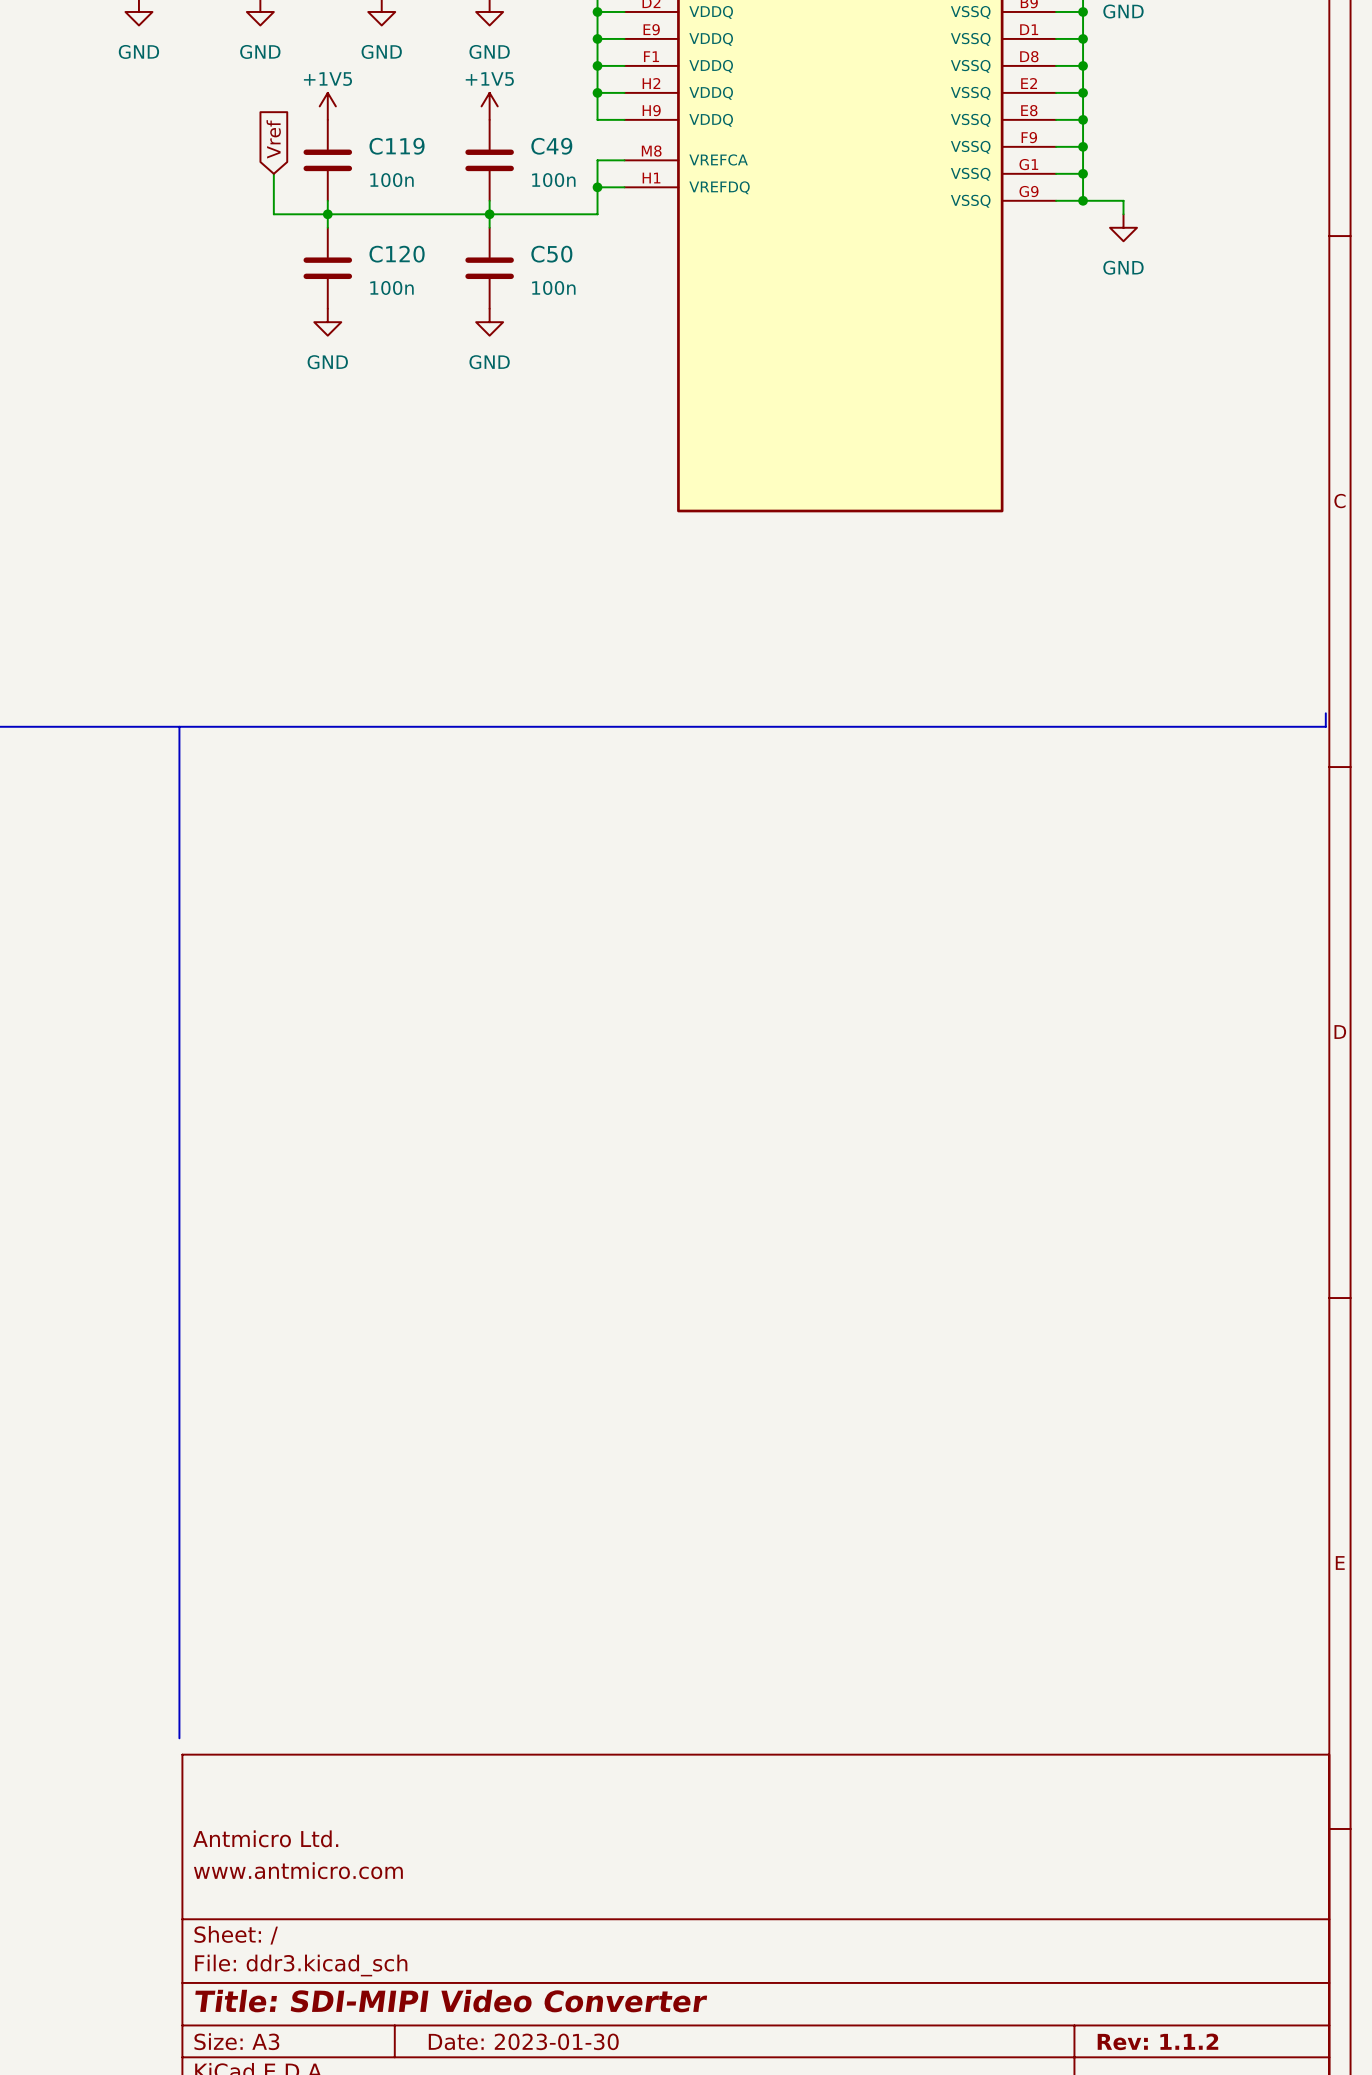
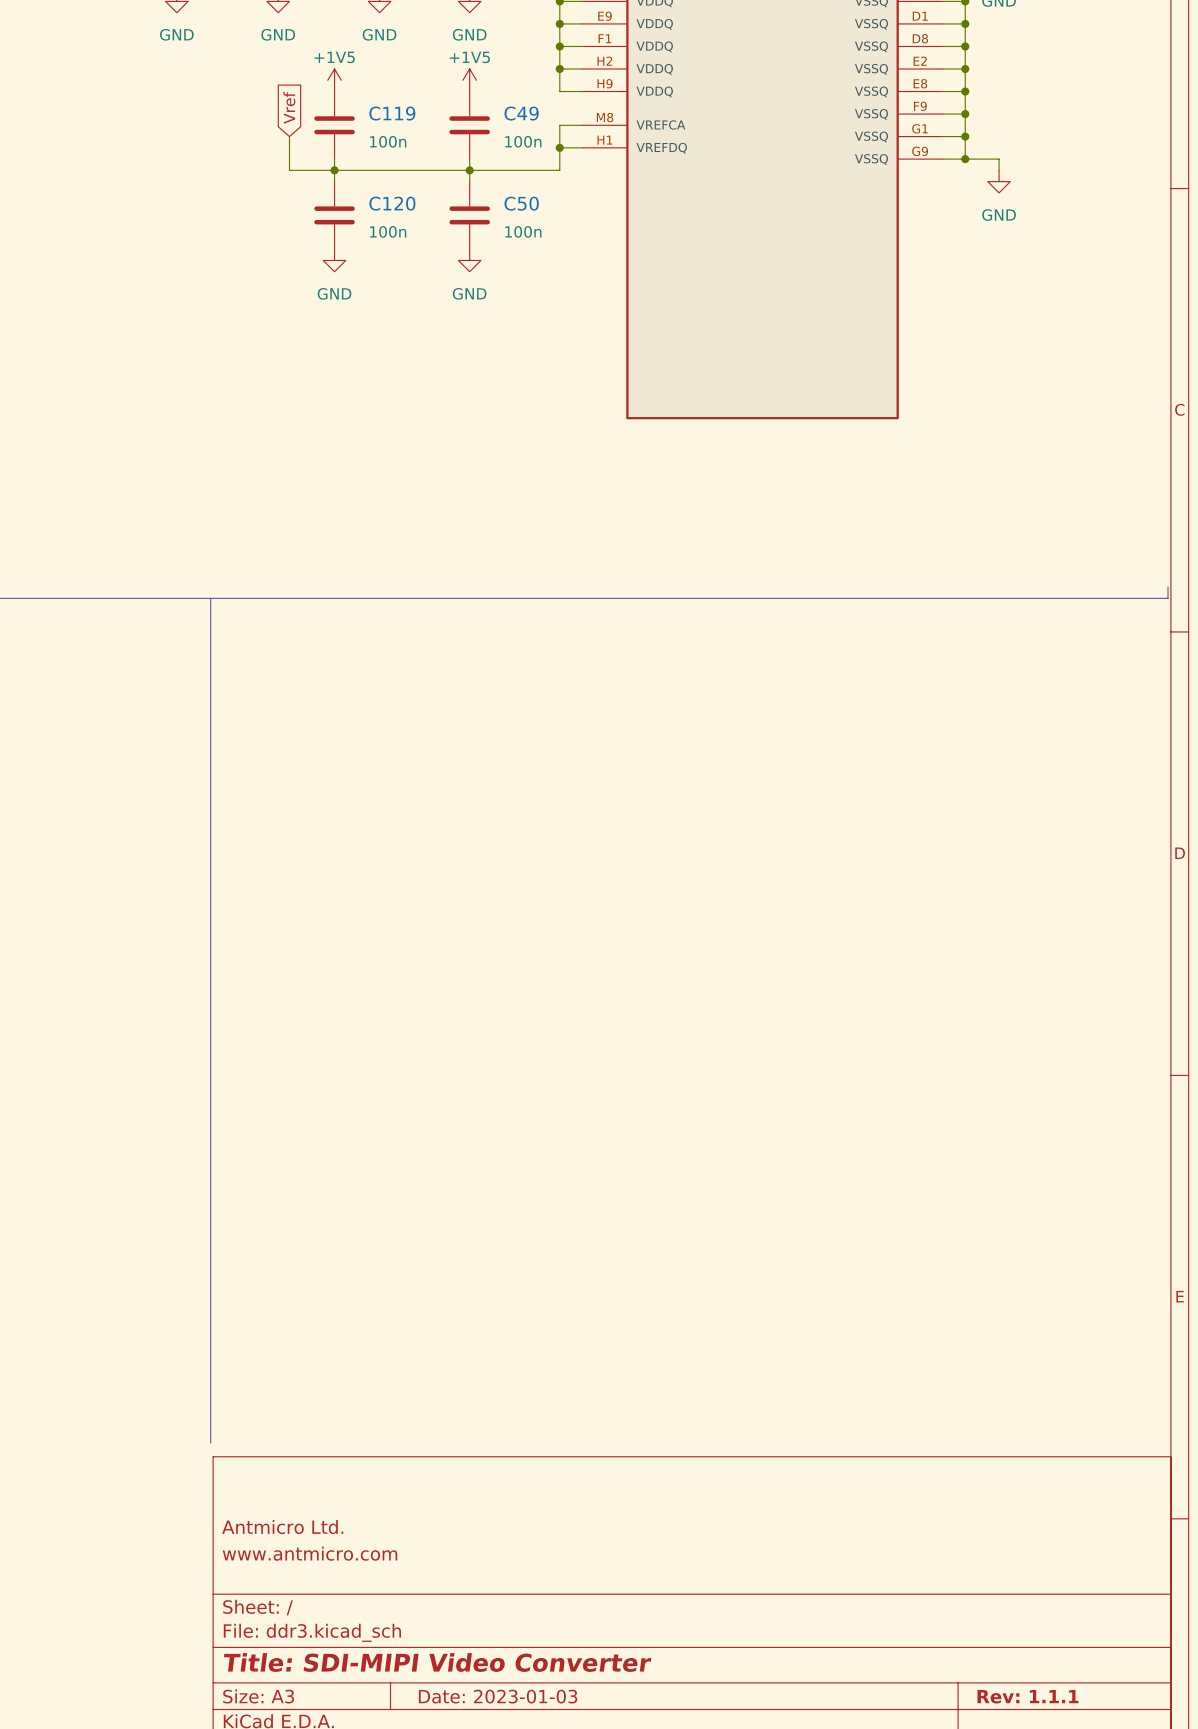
title block: Date: 2023-01-30 (523, 2041) -> Date: 2023-01-03 (498, 1696)
title block: Rev: 1.1.2 (1157, 2041) -> Rev: 1.1.1 (1027, 1696)

